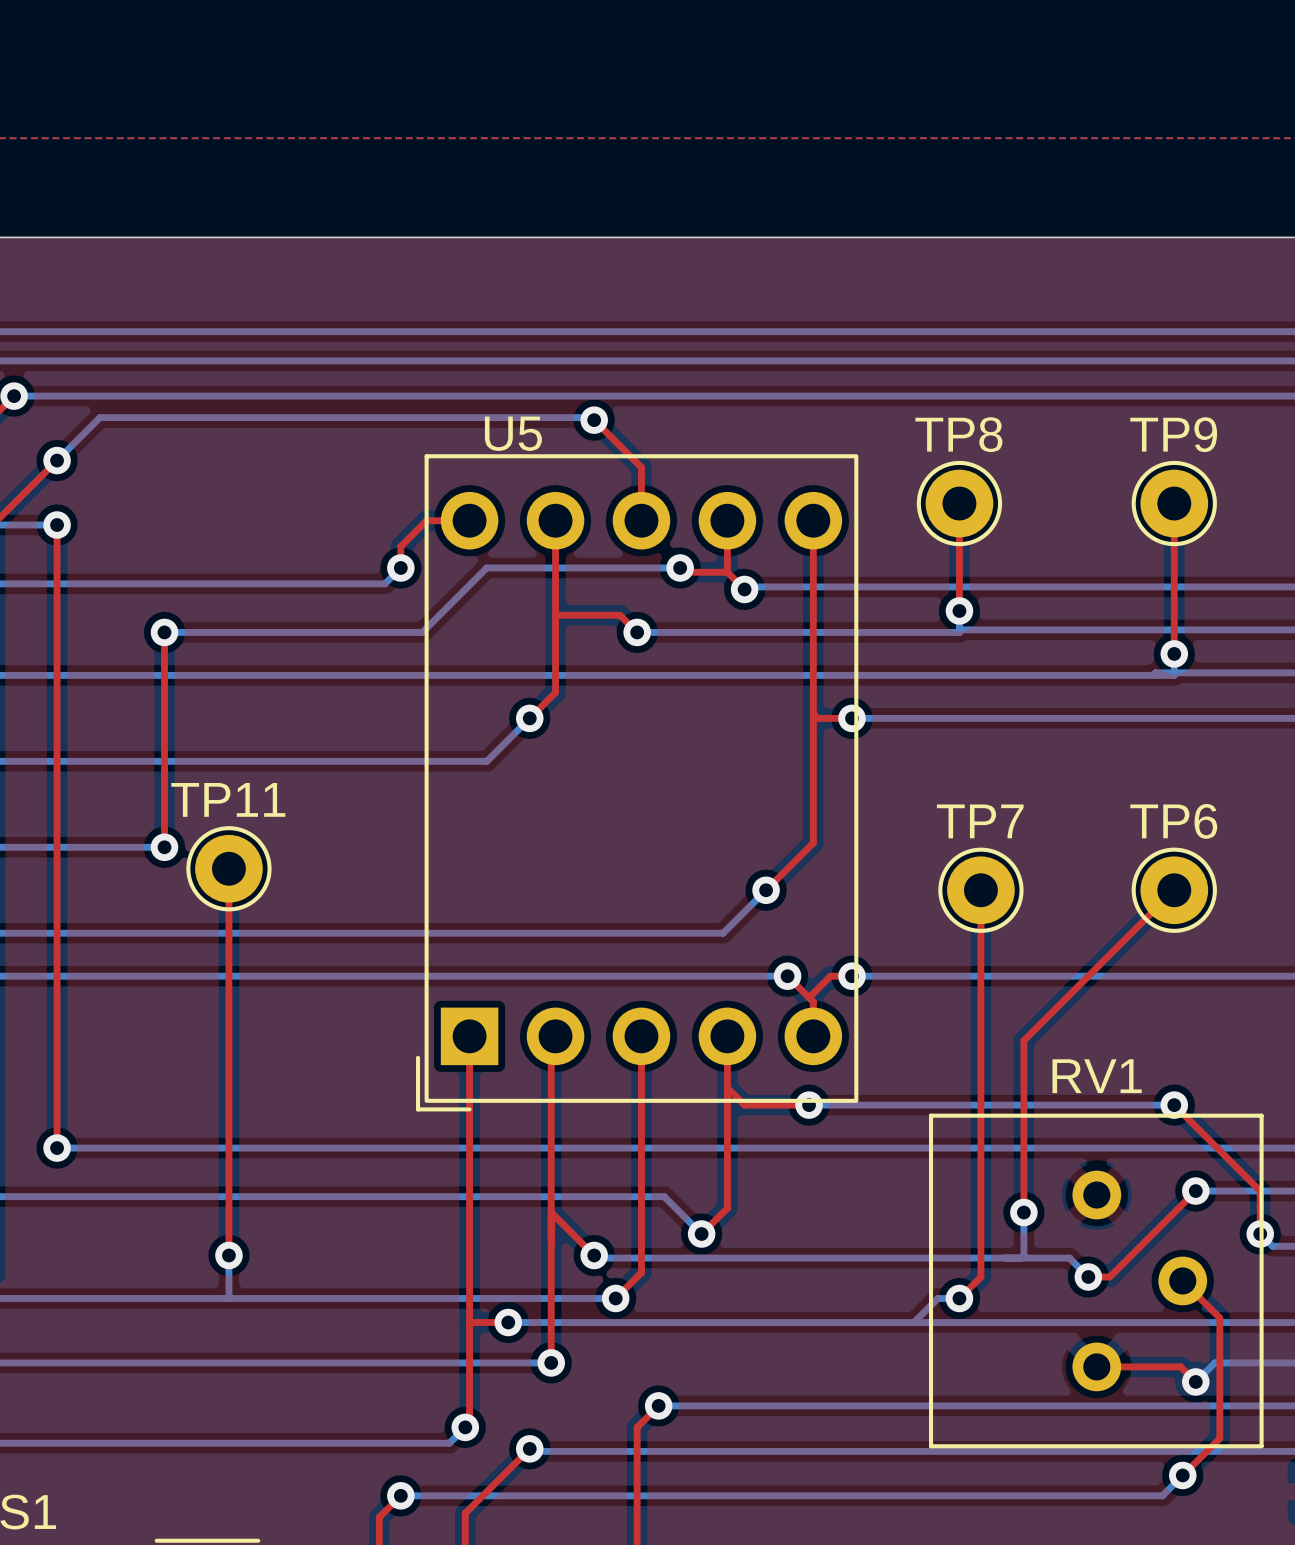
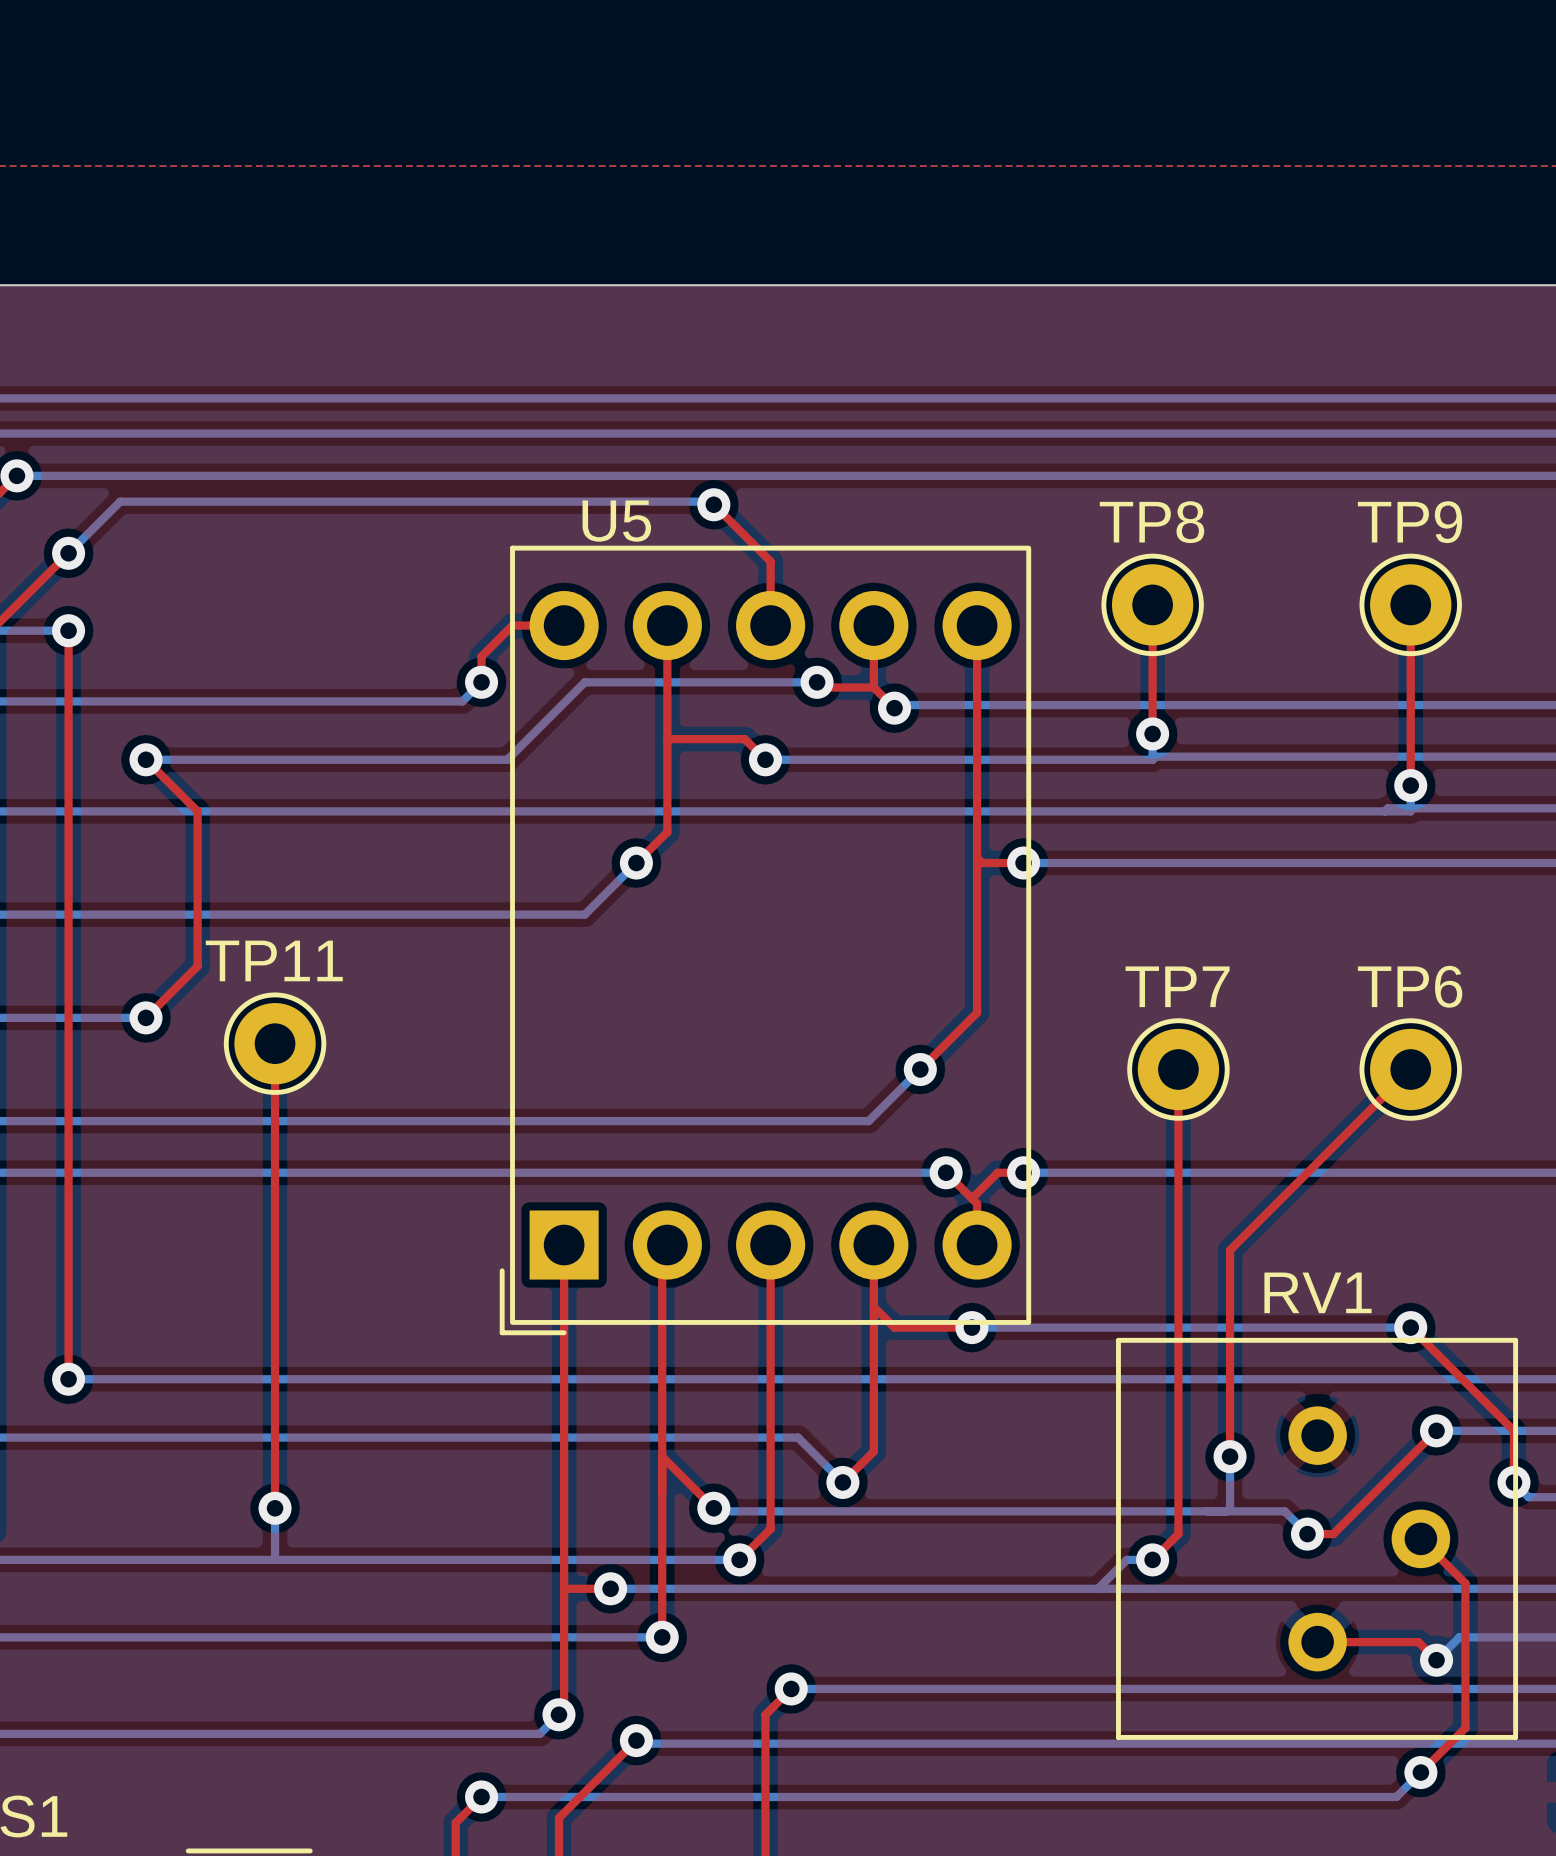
top track: (164, 632) (164, 675) -> (146, 759) (197, 811)
via position: (164, 632) -> (146, 759)
top track: (164, 804) (164, 847) -> (197, 966) (146, 1017)
bottom track: (121, 847) (164, 847) -> (146, 759) (197, 759)
via position: (164, 847) -> (146, 1017)

